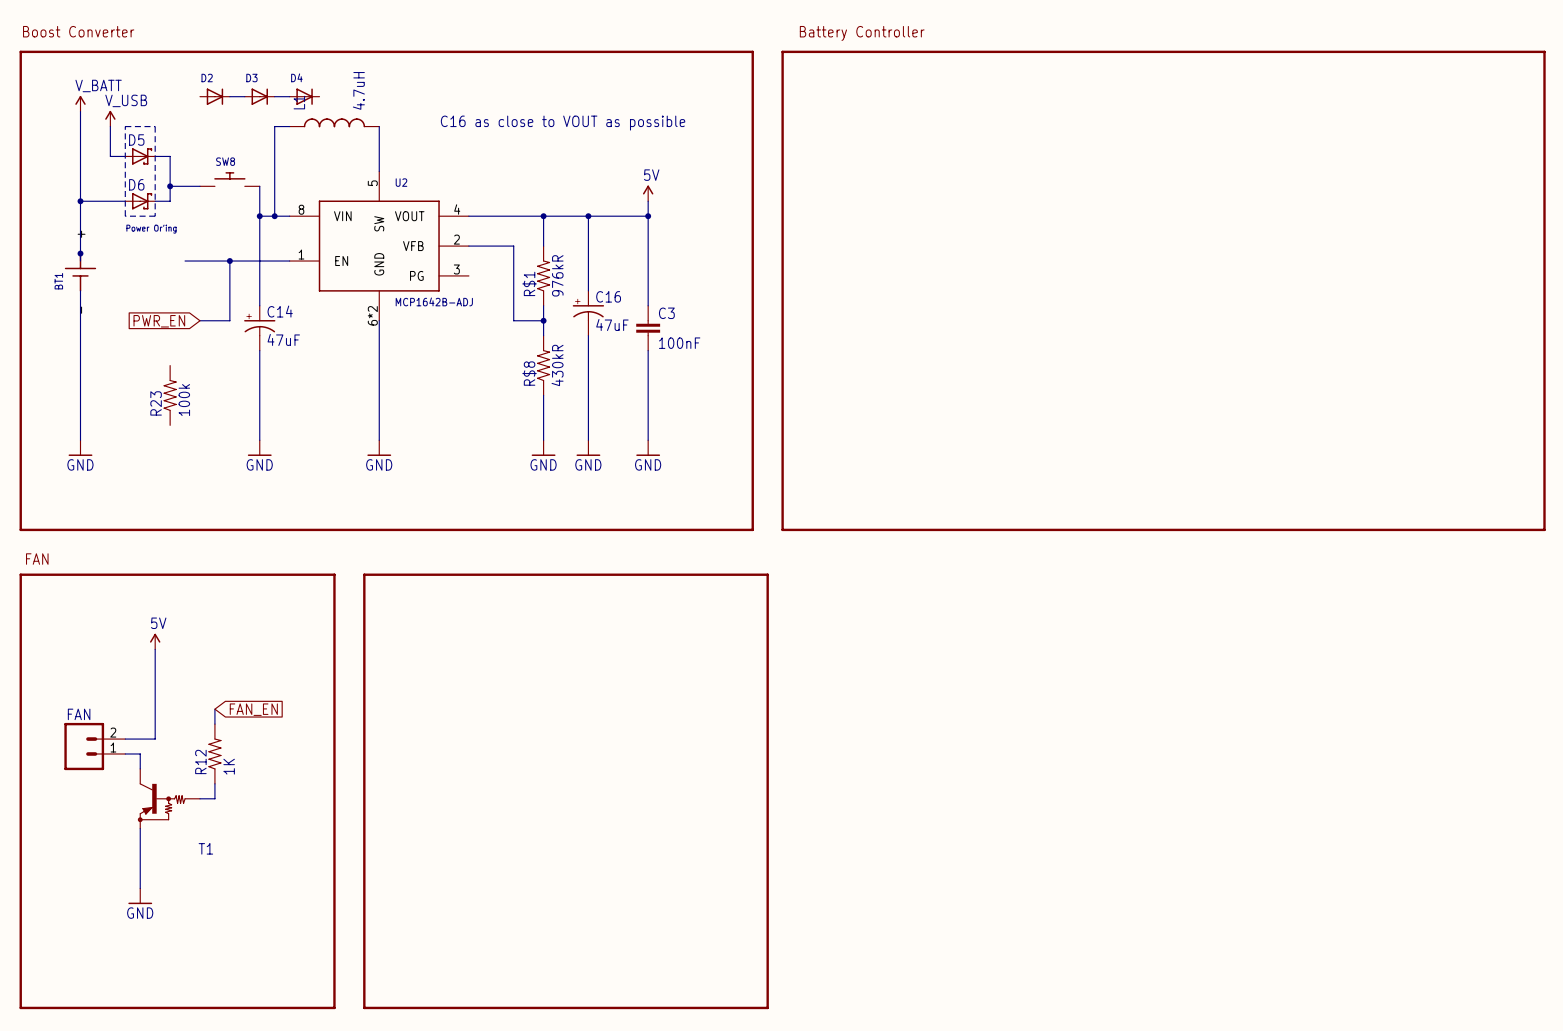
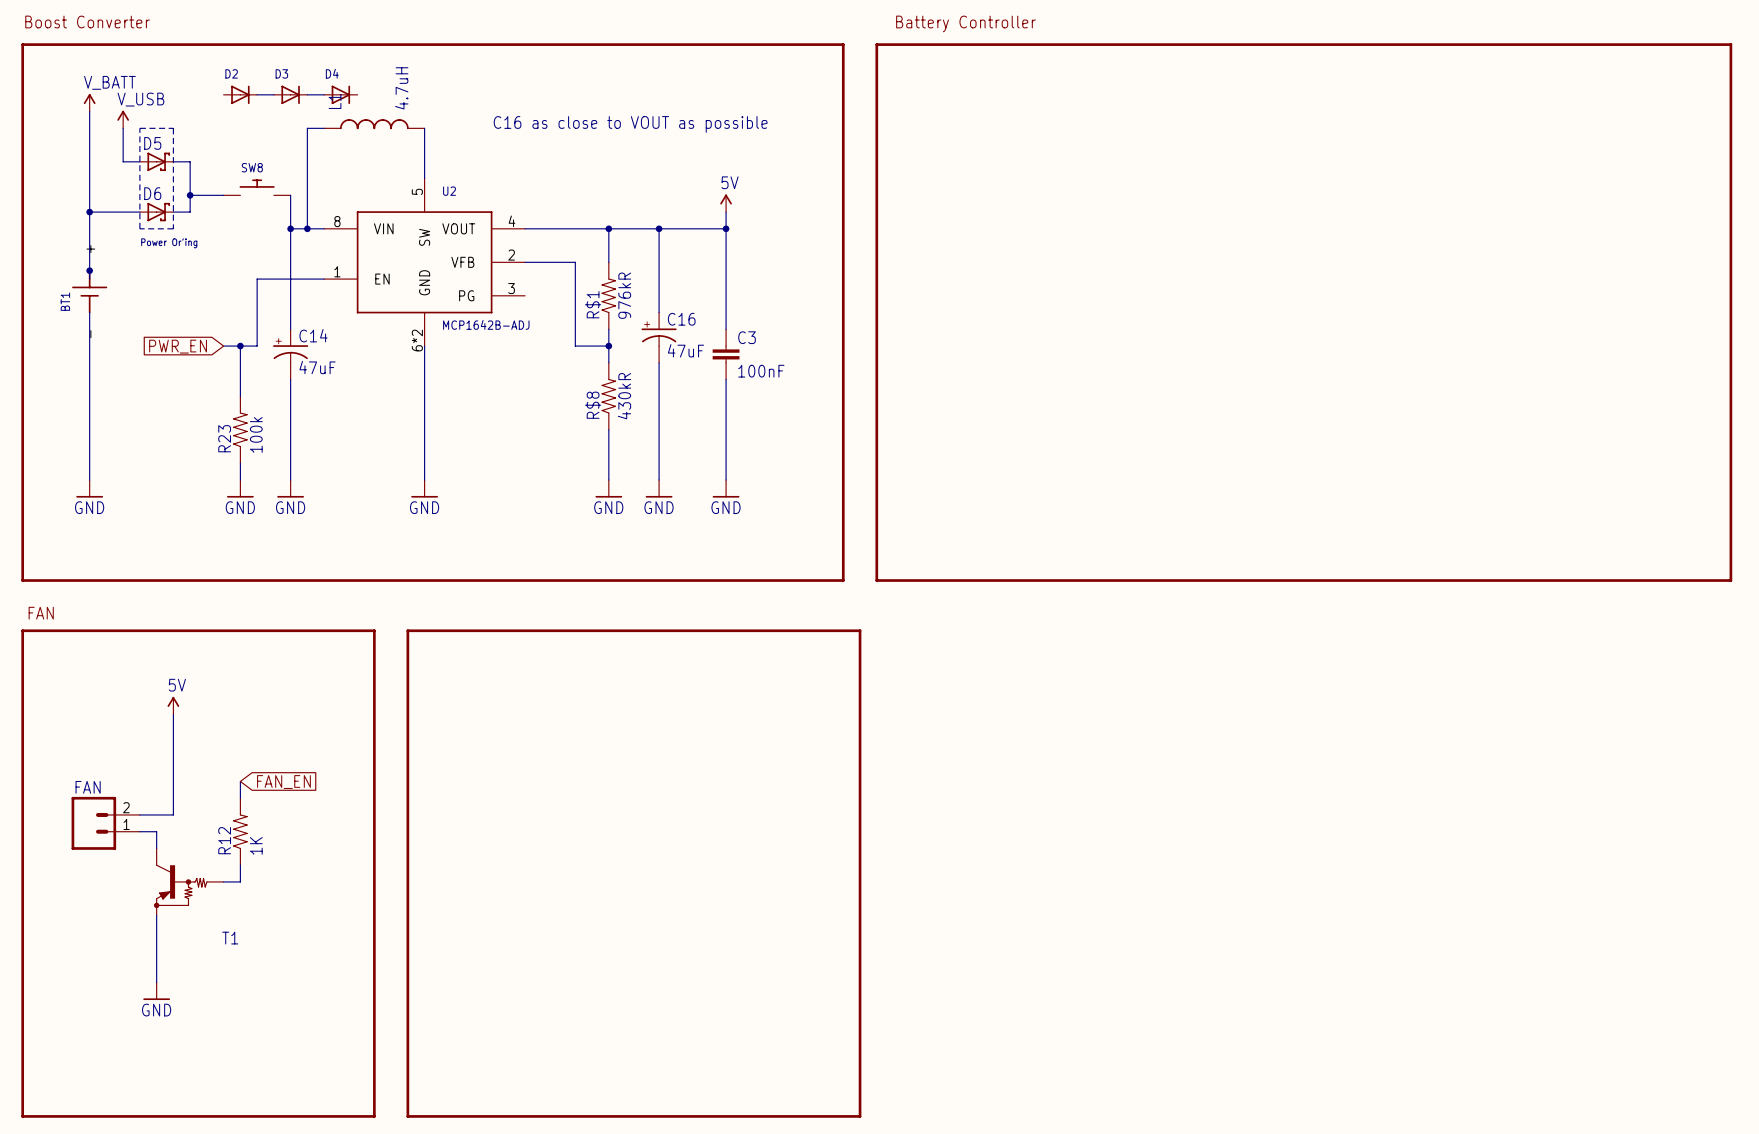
wire: (185, 261) (229, 261) -> none
junction: (229, 261) -> none
wire: none -> (240, 346) (240, 396)
junction: none -> (240, 346)
R23 position: (170, 395) -> (240, 429)
wire: none -> (240, 463) (240, 480)
power symbol: none -> GND (240, 488)

